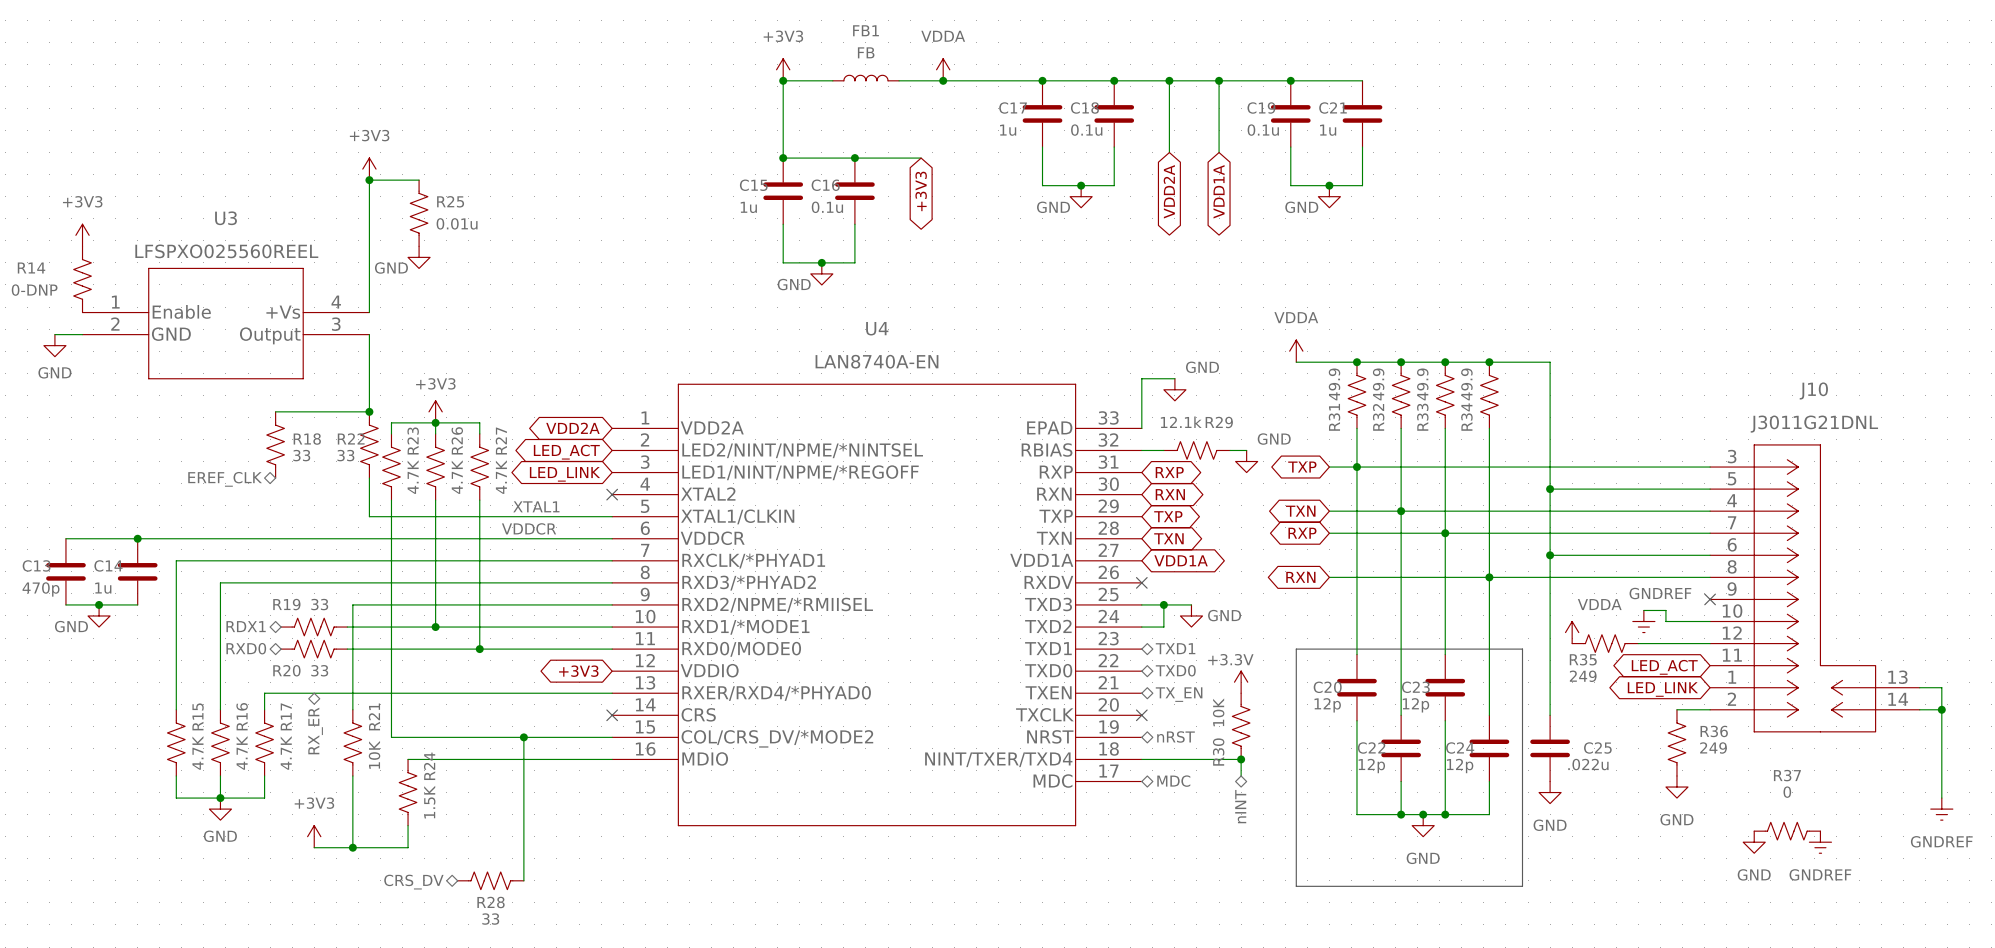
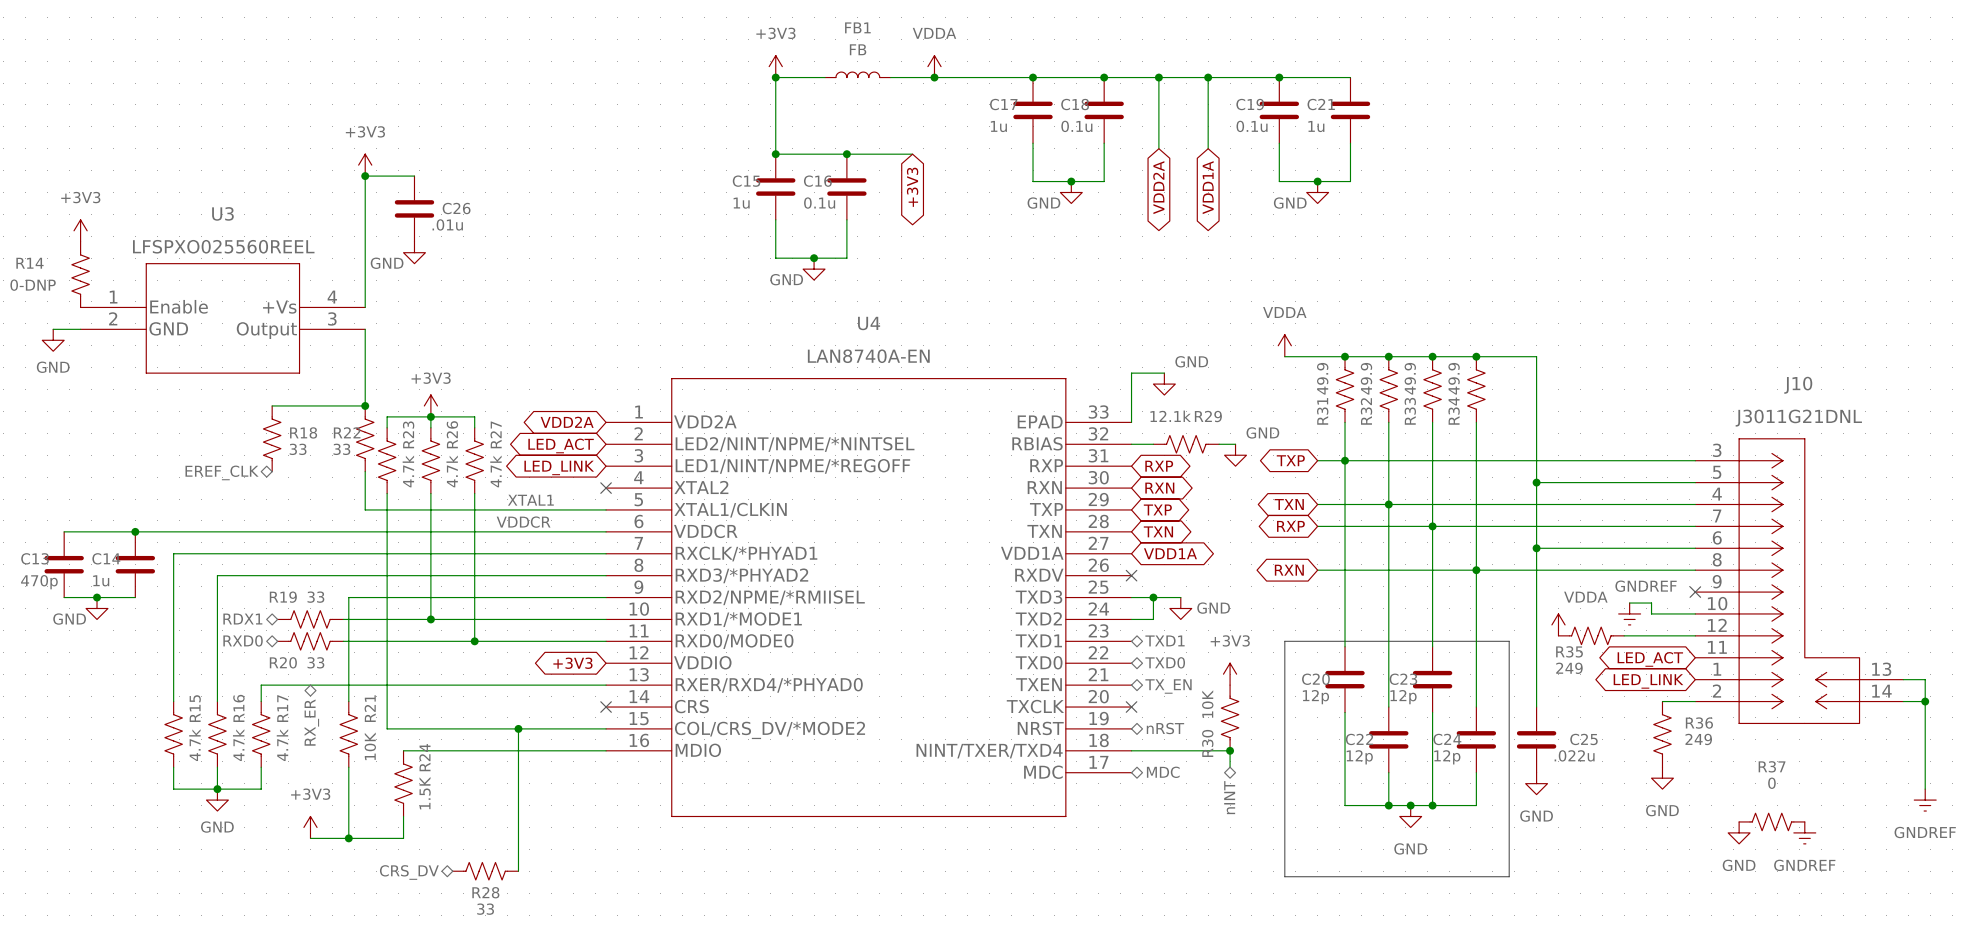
R25: 0.01u (419, 213) -> none
C26: none -> .01u (414, 208)
R23 value: 4.7K (413, 477) -> 4.7k (408, 471)
R26 value: 4.7K (457, 477) -> 4.7k (452, 471)
R27 value: 4.7K (501, 477) -> 4.7k (495, 471)
power symbol: +3.3V (1241, 682) -> +3V3 (1230, 674)
R15 value: 4.7K (197, 752) -> 4.7k (194, 745)
R16 value: 4.7K (242, 752) -> 4.7k (238, 745)
R17 value: 4.7K (286, 752) -> 4.7k (282, 745)

